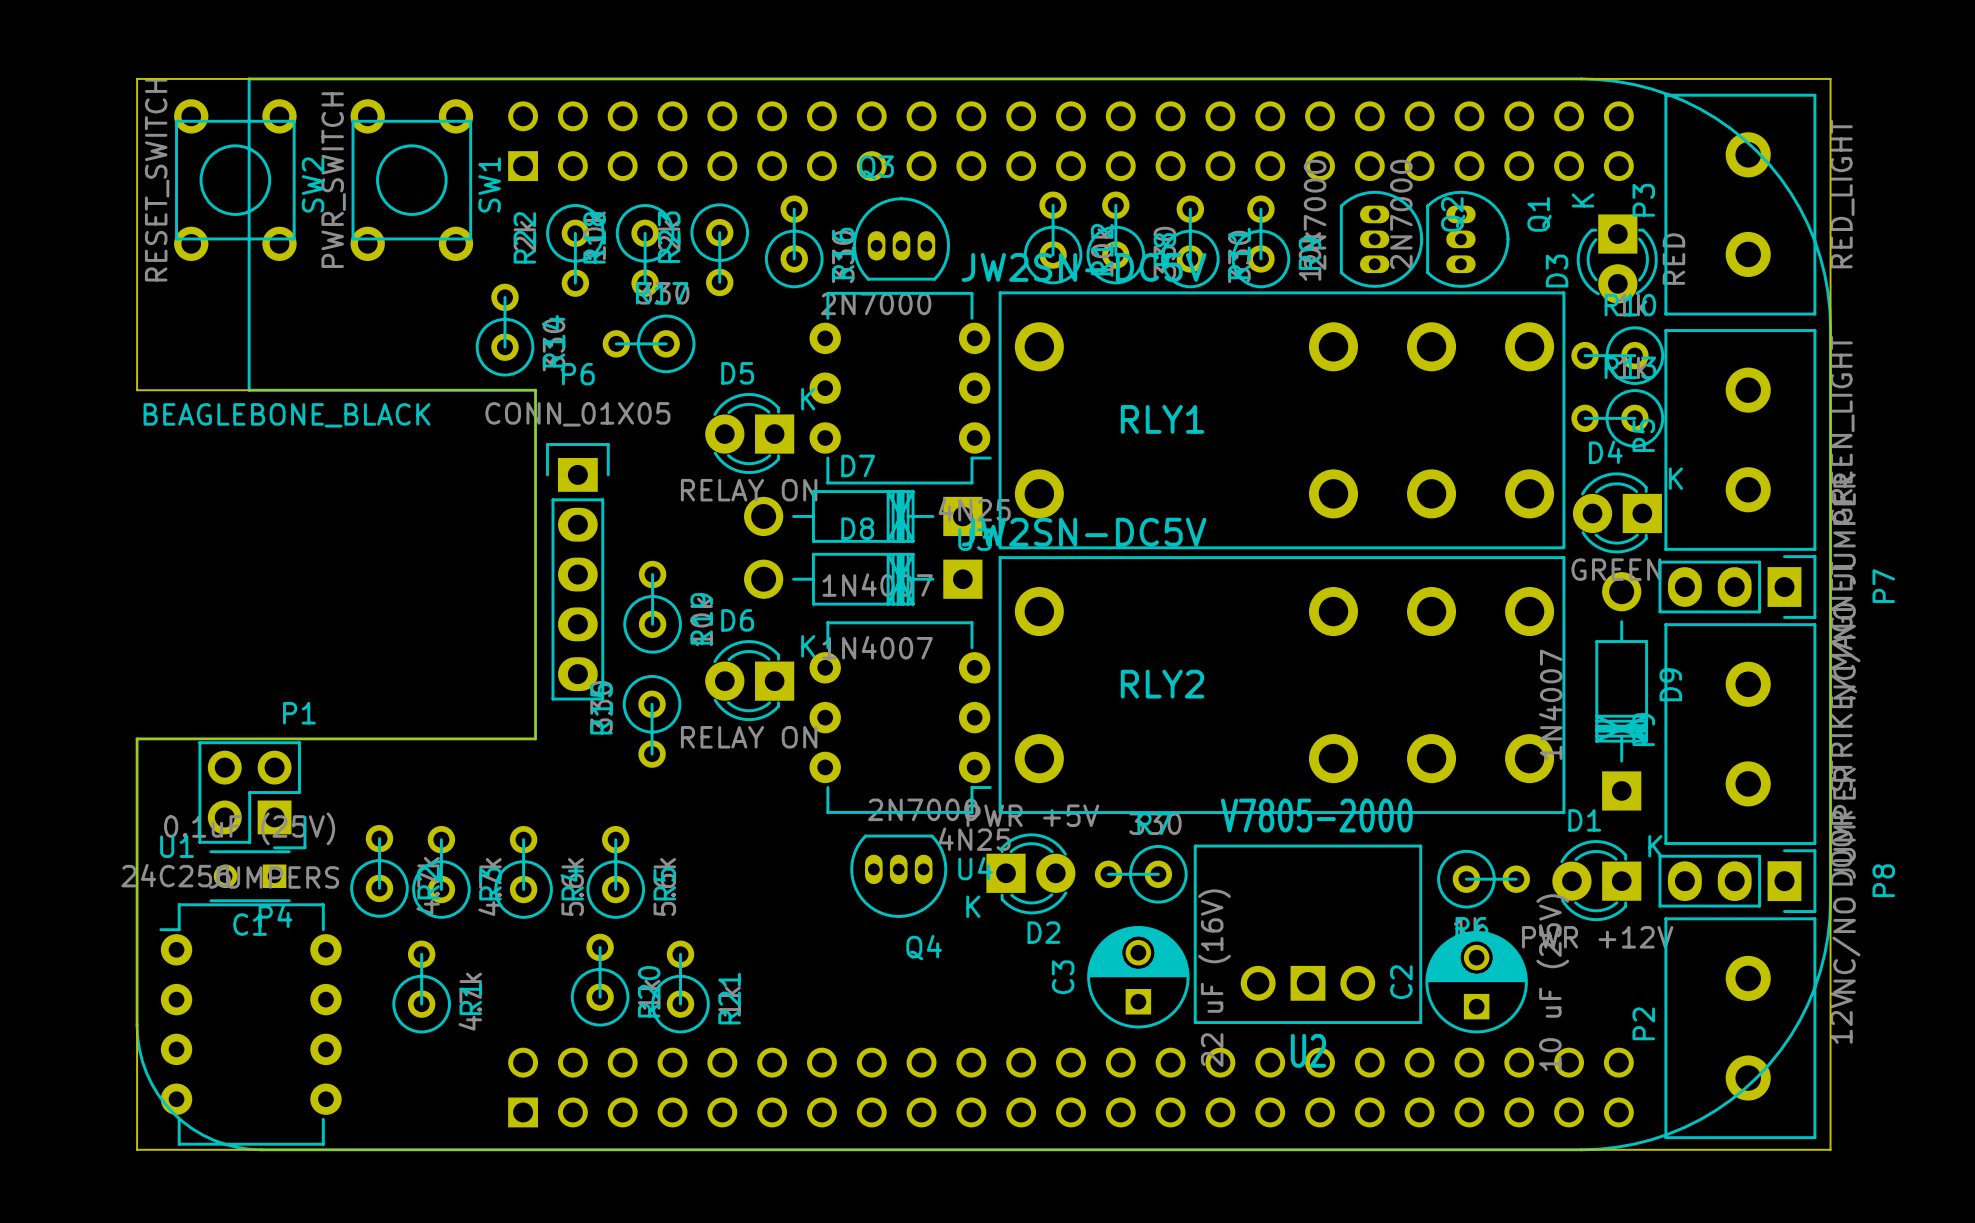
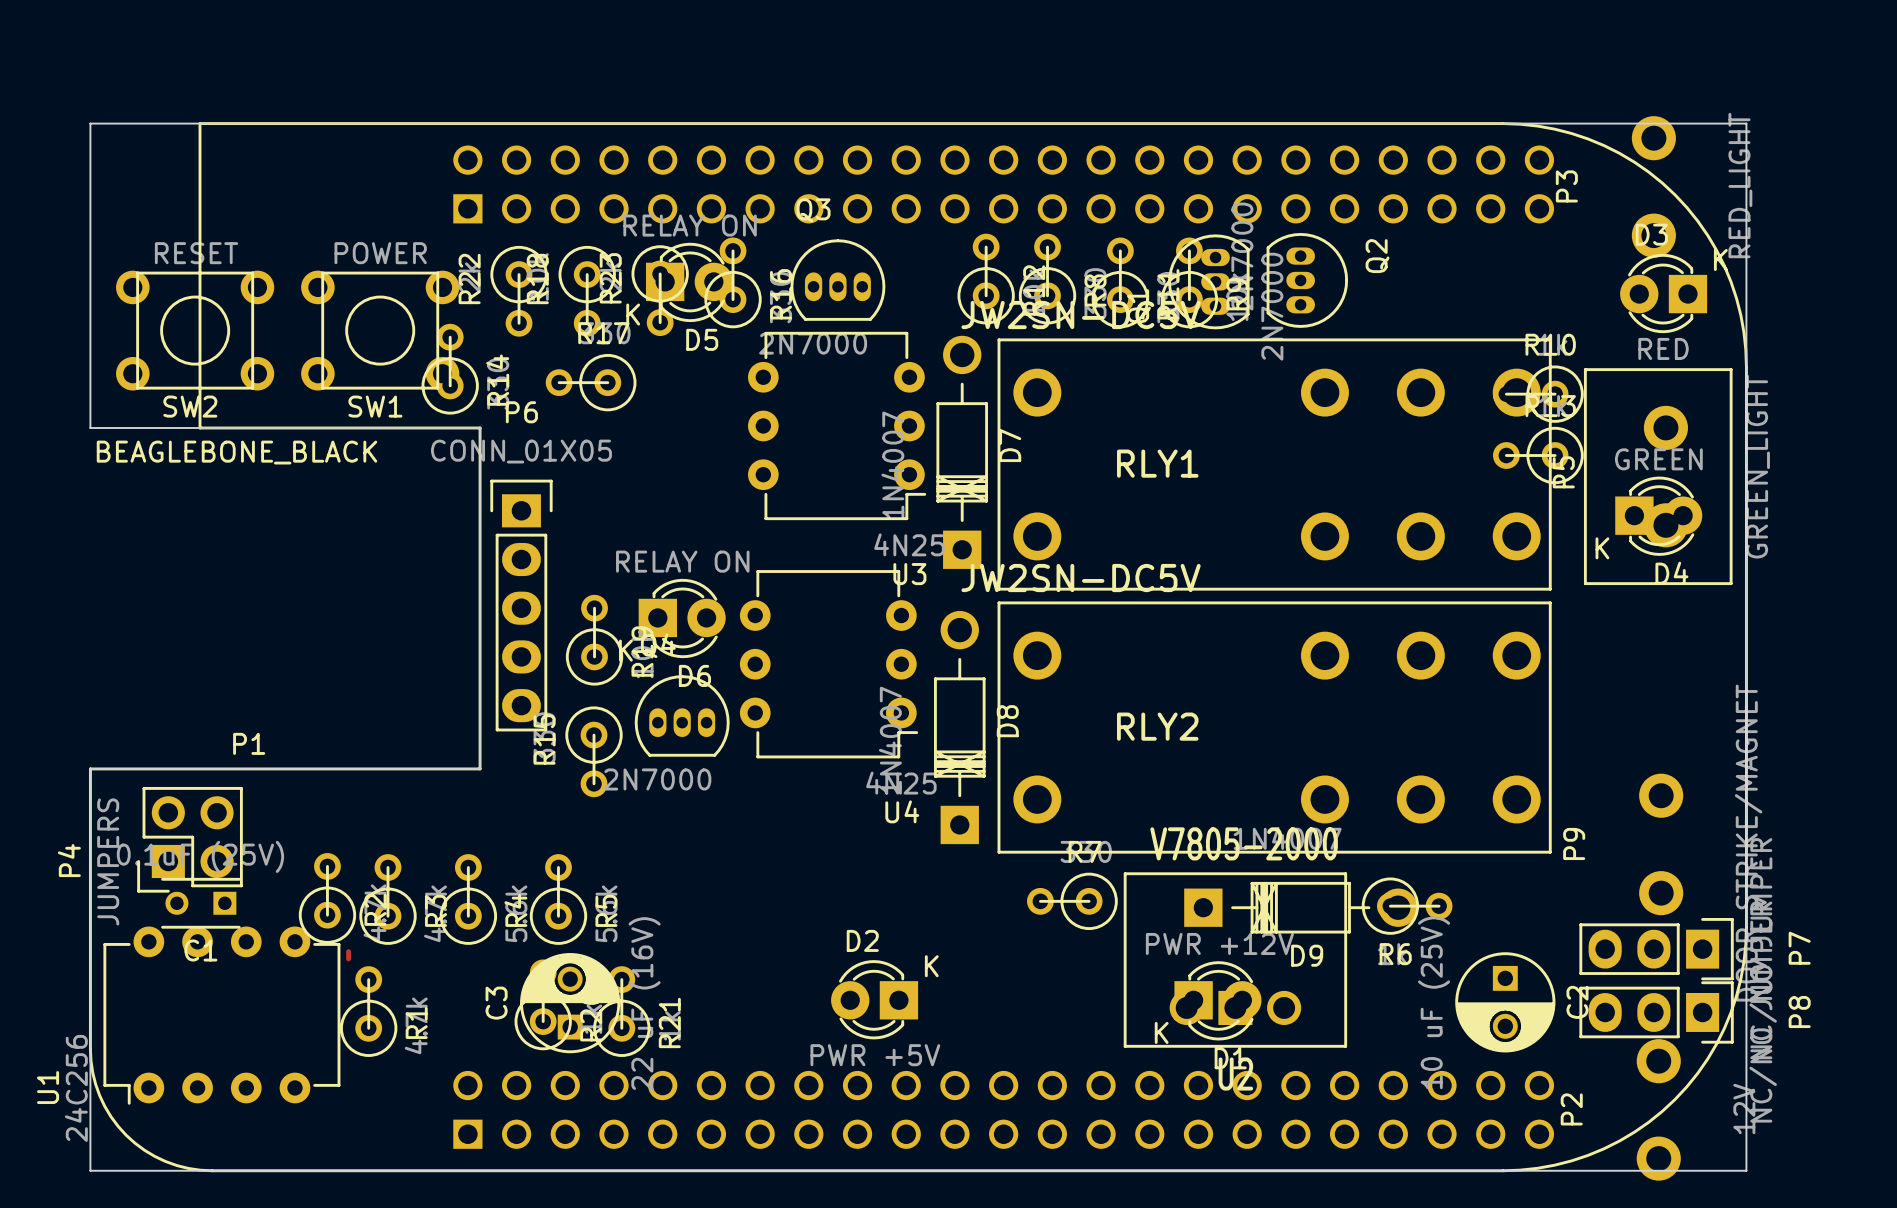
P3 footprint: [1664, 93, 1817, 316] -> [1631, 116, 1676, 258]
SW2 value: RESET_SWITCH (157, 180) -> RESET (196, 253)
SW2 rotation: 0° (235, 180) -> 90° clockwise (195, 330)
SW2 position: (235, 180) -> (195, 330)
SW1 value: PWR_SWITCH (333, 180) -> POWER (380, 253)
SW1 rotation: 0° (411, 180) -> 90° clockwise (380, 330)
SW1 position: (411, 180) -> (380, 330)
Q1 rotation: 0° (1467, 239) -> 180° (1208, 281)
Q1 position: (1467, 239) -> (1208, 281)
D3 rotation: 0° (1617, 258) -> 90° clockwise (1663, 293)
D3 position: (1617, 258) -> (1663, 293)
RLY1 position: (1282, 420) -> (1274, 464)
D5 rotation: 0° (749, 433) -> 180° (689, 282)
D5 position: (749, 433) -> (689, 282)
D4 rotation: 0° (1617, 512) -> 180° (1658, 516)
D4 position: (1617, 512) -> (1658, 516)
D7 rotation: 0° (863, 516) -> 90° clockwise (962, 452)
D7 position: (863, 516) -> (962, 452)
D8 rotation: 0° (863, 579) -> 90° clockwise (959, 727)
D8 position: (863, 579) -> (959, 727)
P7 position: (1737, 587) -> (1656, 949)
P9 footprint: [1664, 623, 1817, 845] -> [1639, 773, 1684, 916]
D6 rotation: 0° (749, 680) -> 180° (682, 618)
D6 position: (749, 680) -> (682, 618)
RLY2 position: (1282, 685) -> (1274, 727)
D9 rotation: 0° (1621, 691) -> 90° clockwise (1300, 907)
D9 position: (1621, 691) -> (1300, 907)
U4 position: (900, 717) -> (829, 664)
P4 rotation: 0° (252, 795) -> 90° clockwise (190, 839)
D2 rotation: 0° (1030, 873) -> 180° (874, 999)
D2 position: (1030, 873) -> (874, 999)
Q4 rotation: 0° (898, 876) -> 180° (682, 715)
Q4 position: (898, 876) -> (682, 715)
D1 rotation: 0° (1596, 880) -> 180° (1217, 1000)
D1 position: (1596, 880) -> (1217, 1000)
P8 position: (1737, 881) -> (1656, 1012)
P2 footprint: [1664, 917, 1817, 1140] -> [1636, 1039, 1681, 1181]
track: none -> (348, 951) (348, 958)
C3 position: (1138, 977) -> (570, 1003)
C2 rotation: 0° (1476, 982) -> 180° (1505, 1002)
C2 position: (1476, 982) -> (1505, 1002)
U1 rotation: 0° (250, 1024) -> 90° counterclockwise (221, 1015)

